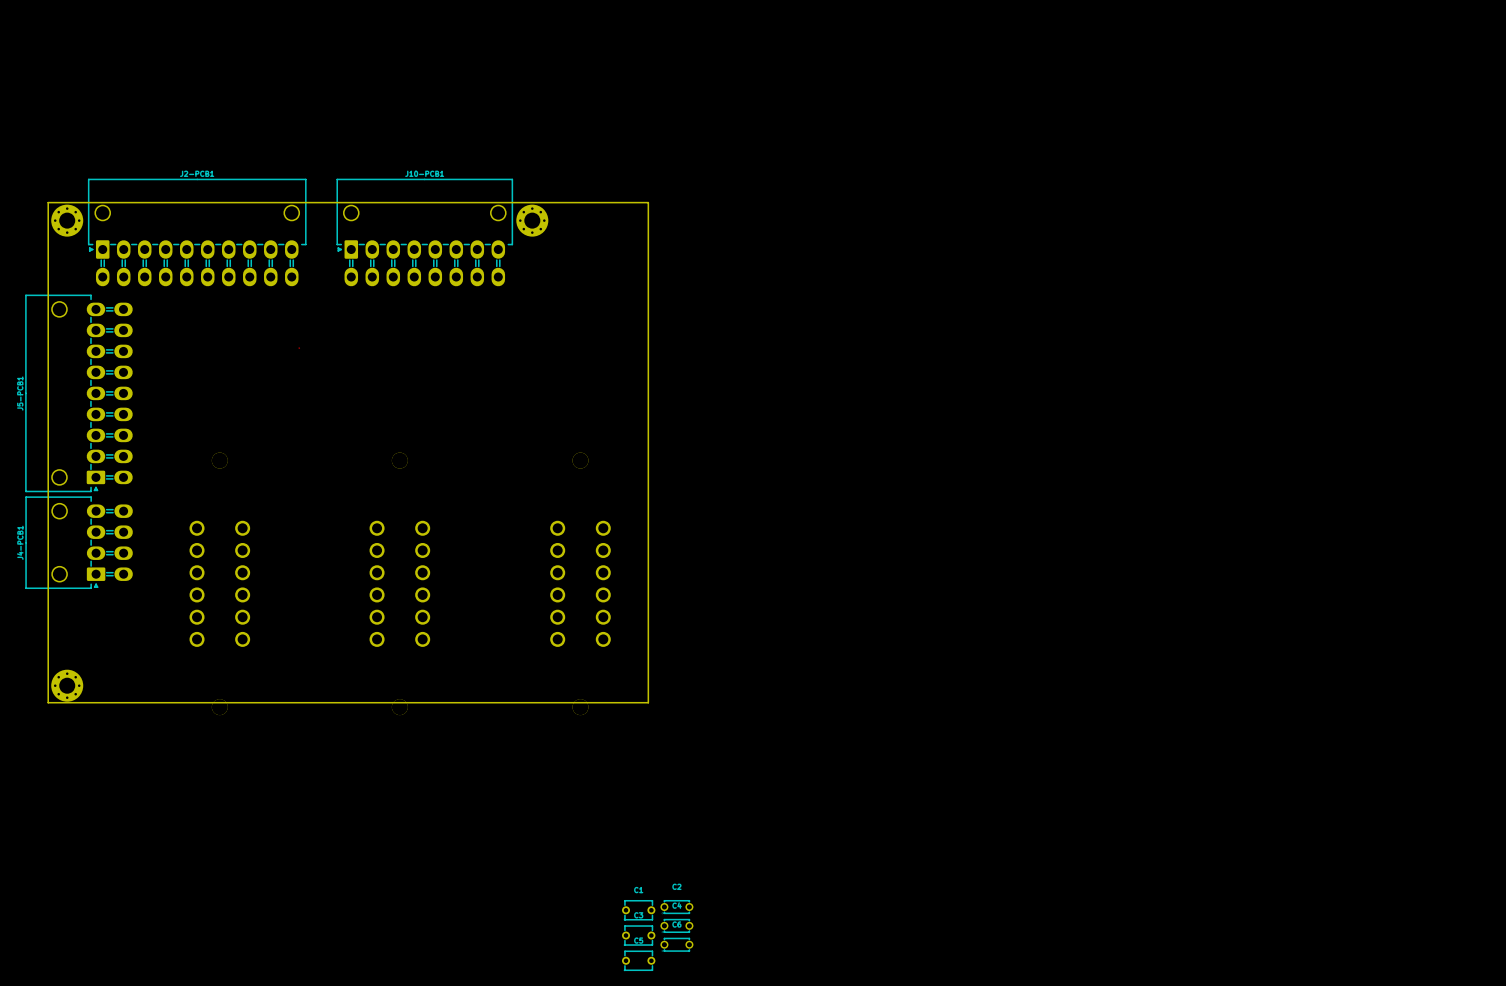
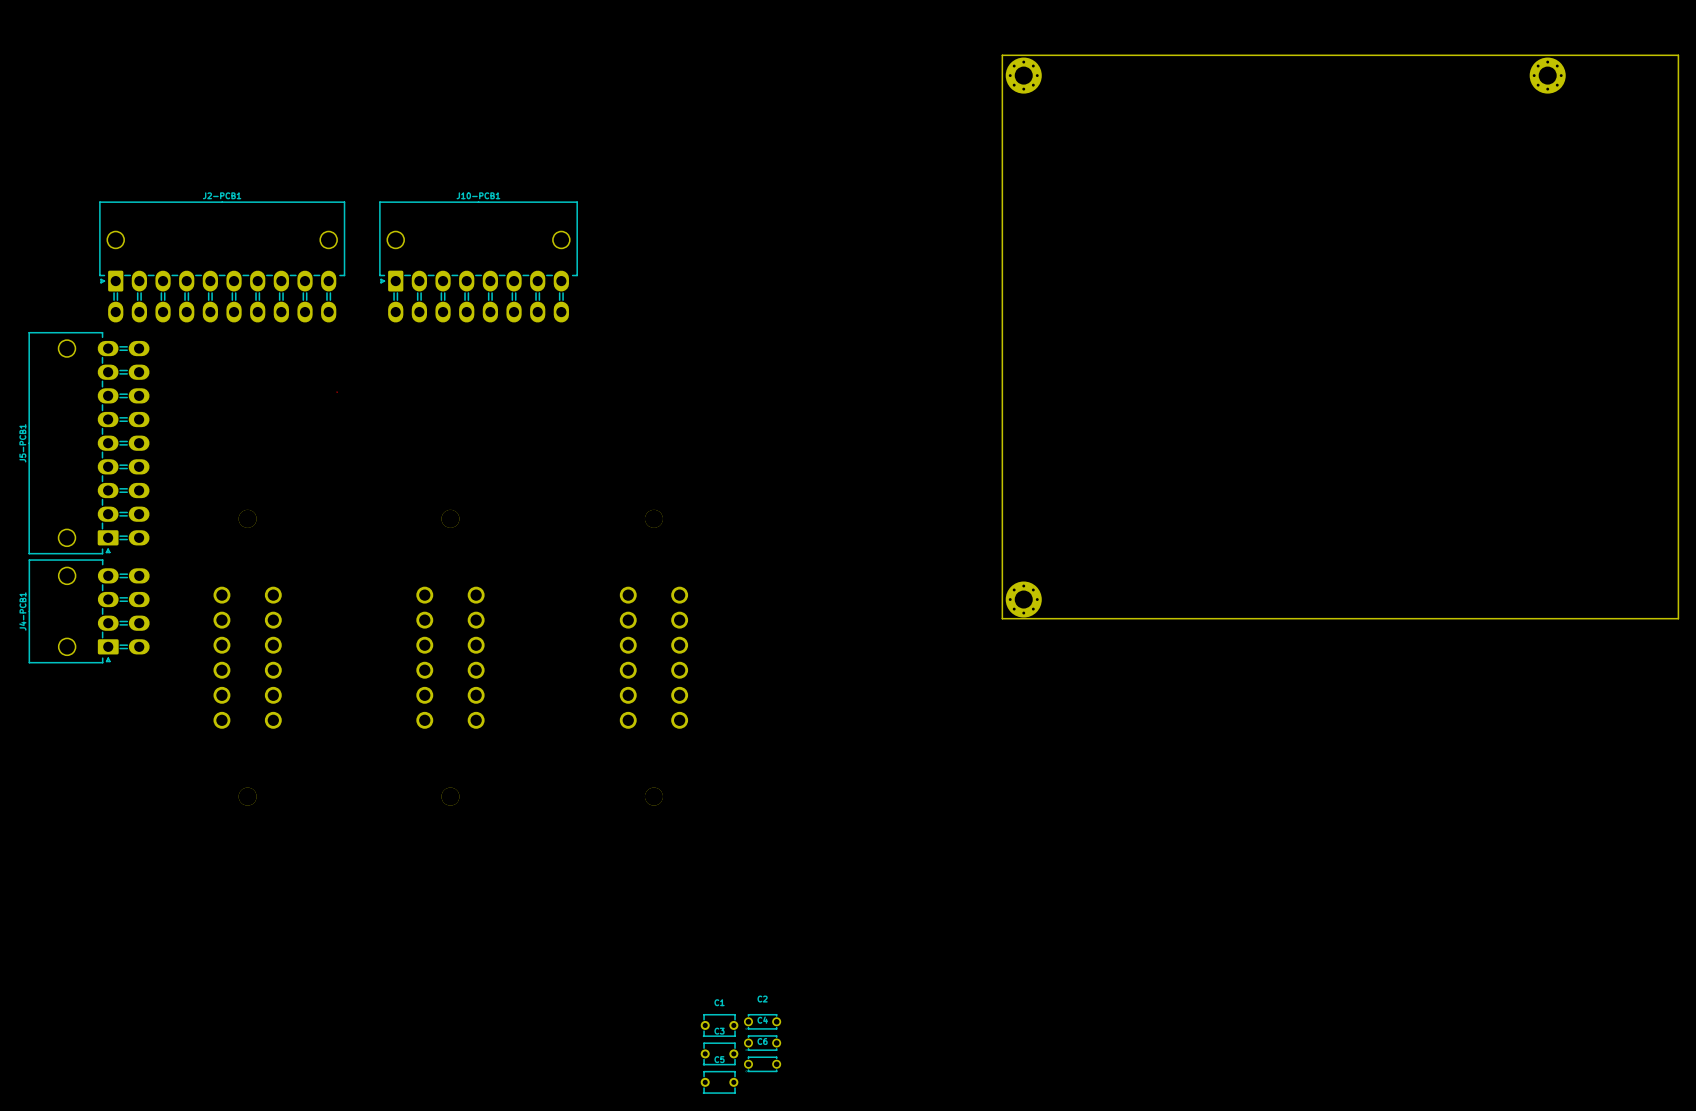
board edge: none -> (1002, 55) (1678, 55) (1678, 618) (1002, 618) (1002, 55)
part: none -> (1023, 75)
part: none -> (1547, 75)
board edge: (48, 202) (648, 202) (648, 702) (48, 702) (48, 202) -> none
part: (67, 220) -> none
part: (532, 220) -> none
part: none -> (1023, 599)
part: (67, 685) -> none

